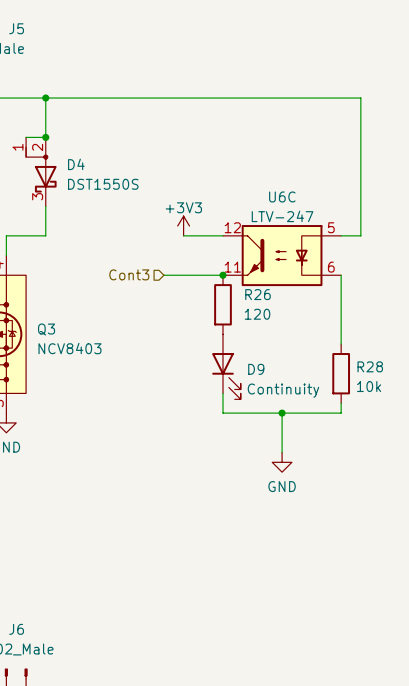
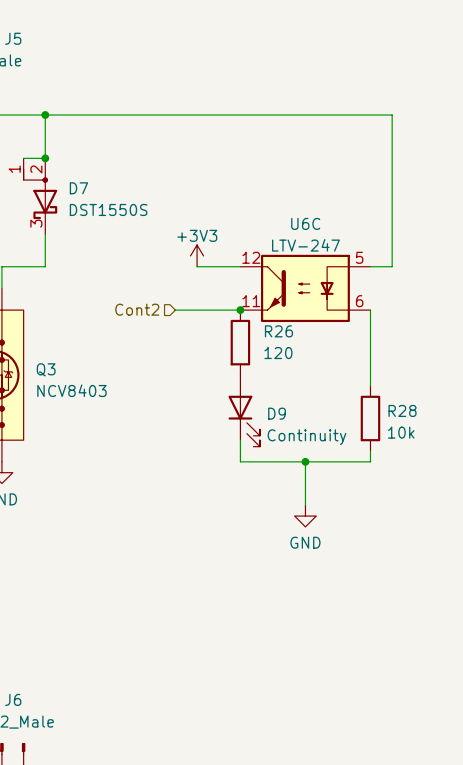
D4 name: D4 (76, 164) -> D7 (78, 188)
hierarchical label: Cont3 (129, 274) -> Cont2 (137, 309)

